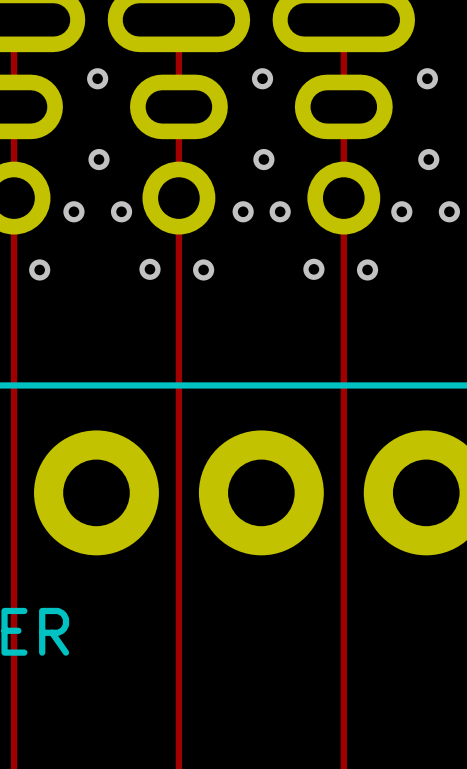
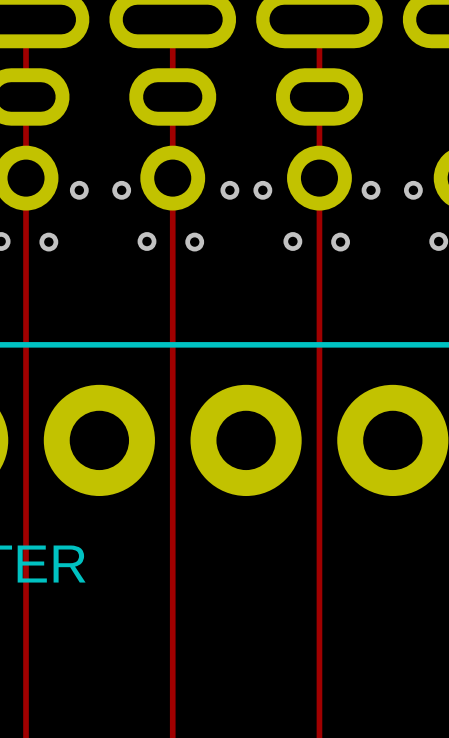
via: (97, 78) -> none
via: (262, 78) -> none
via: (427, 78) -> none
via: (99, 159) -> none
via: (263, 159) -> none
via: (428, 159) -> none

